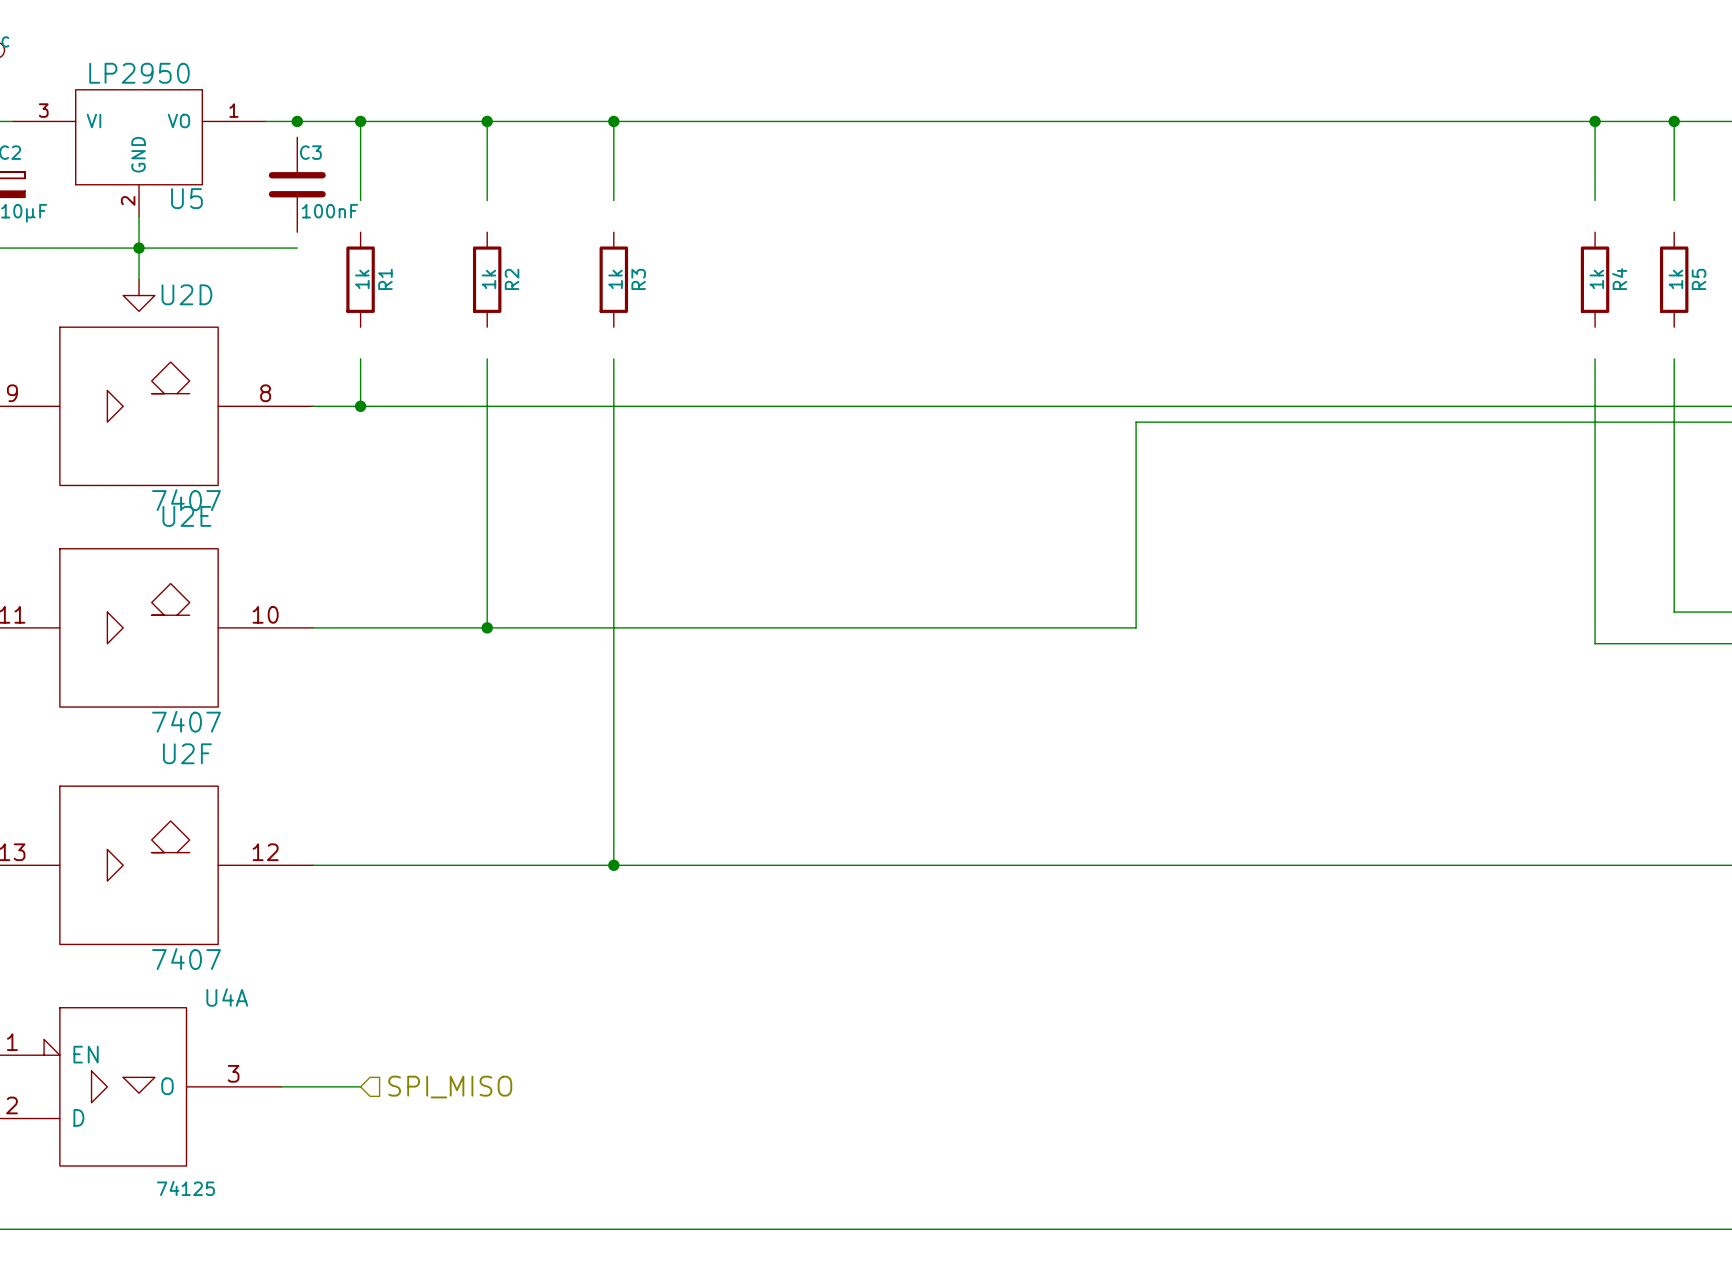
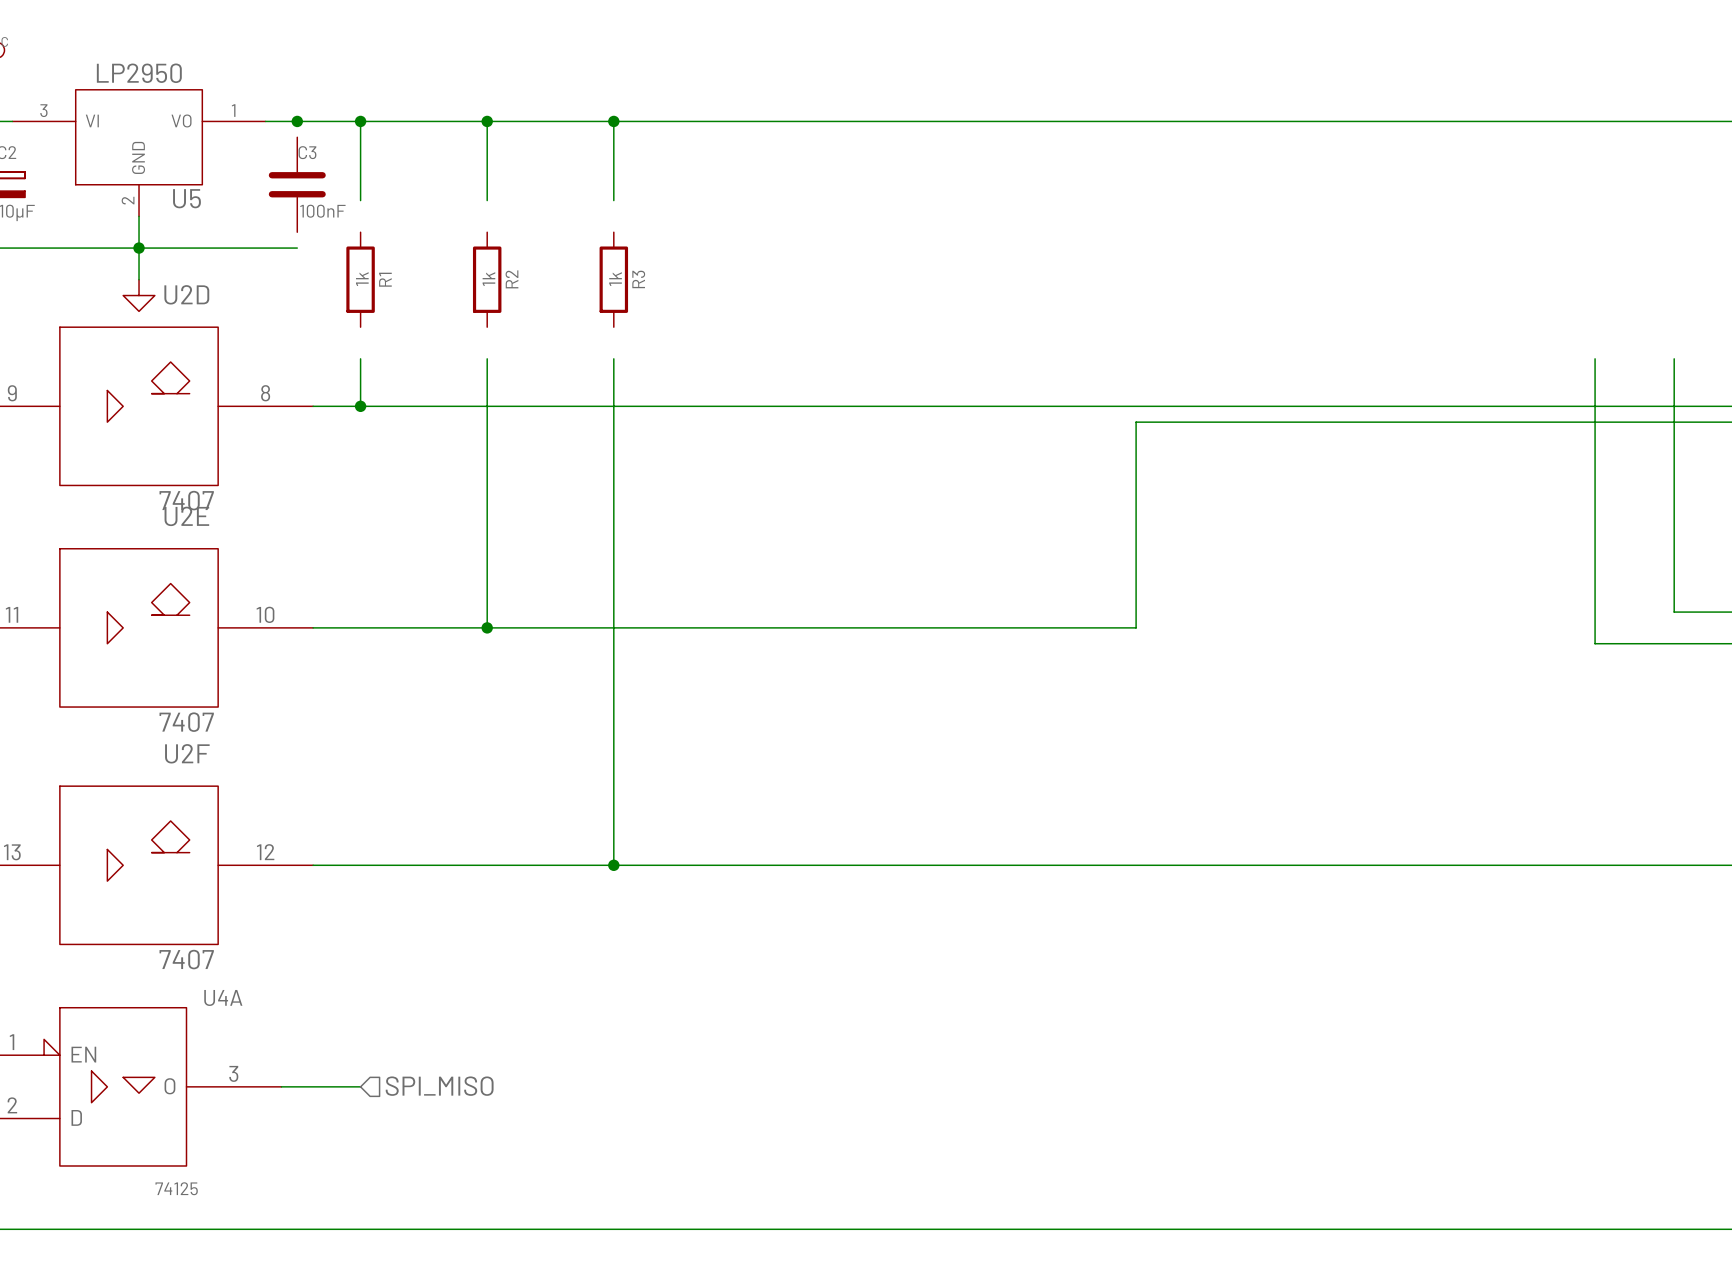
wire: (1595, 121) (1595, 200) -> none
junction: (1595, 121) -> none
wire: (1674, 121) (1674, 200) -> none
junction: (1674, 121) -> none
R4: 1k (1595, 279) -> none
R5: 1k (1674, 279) -> none

